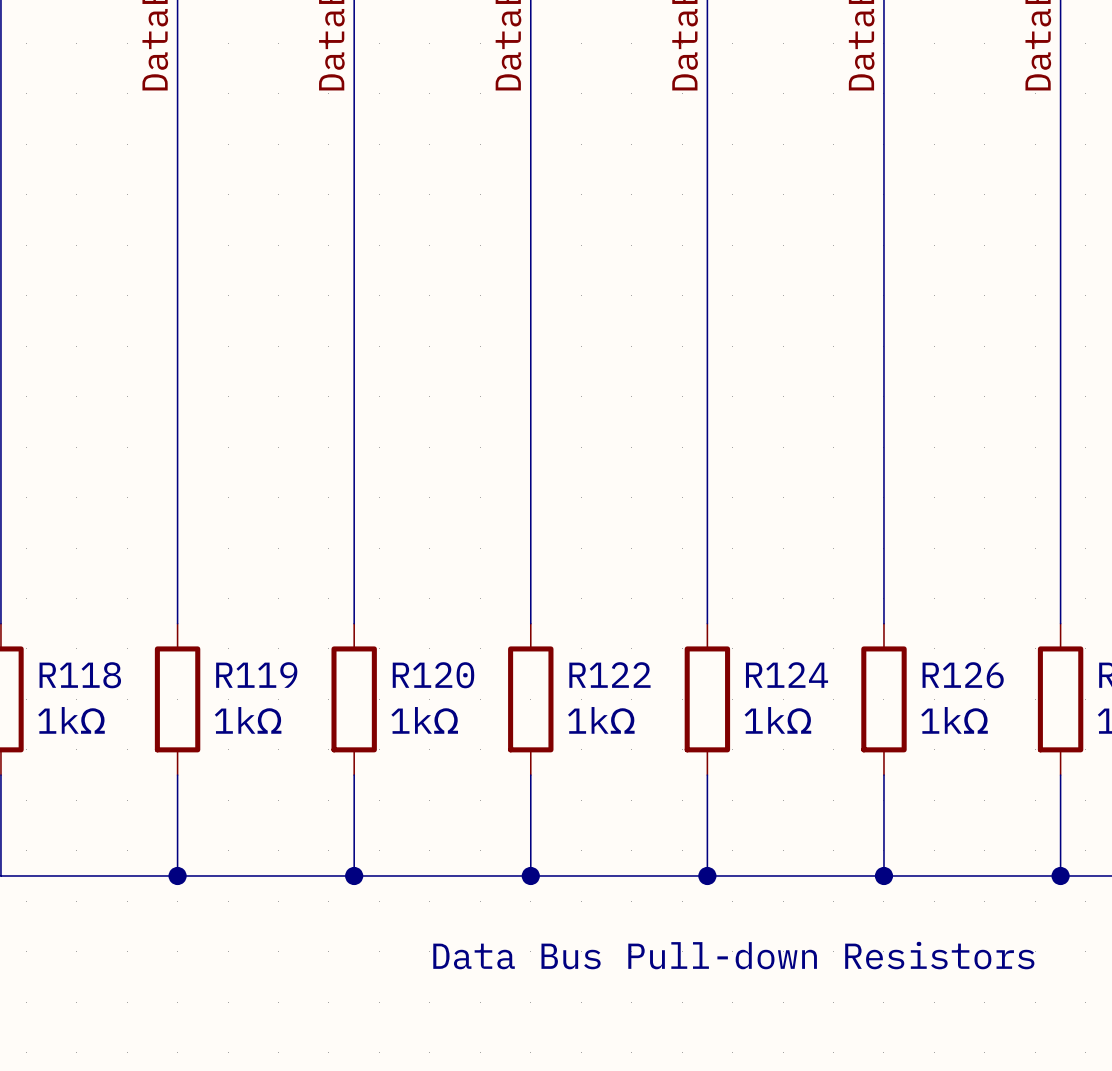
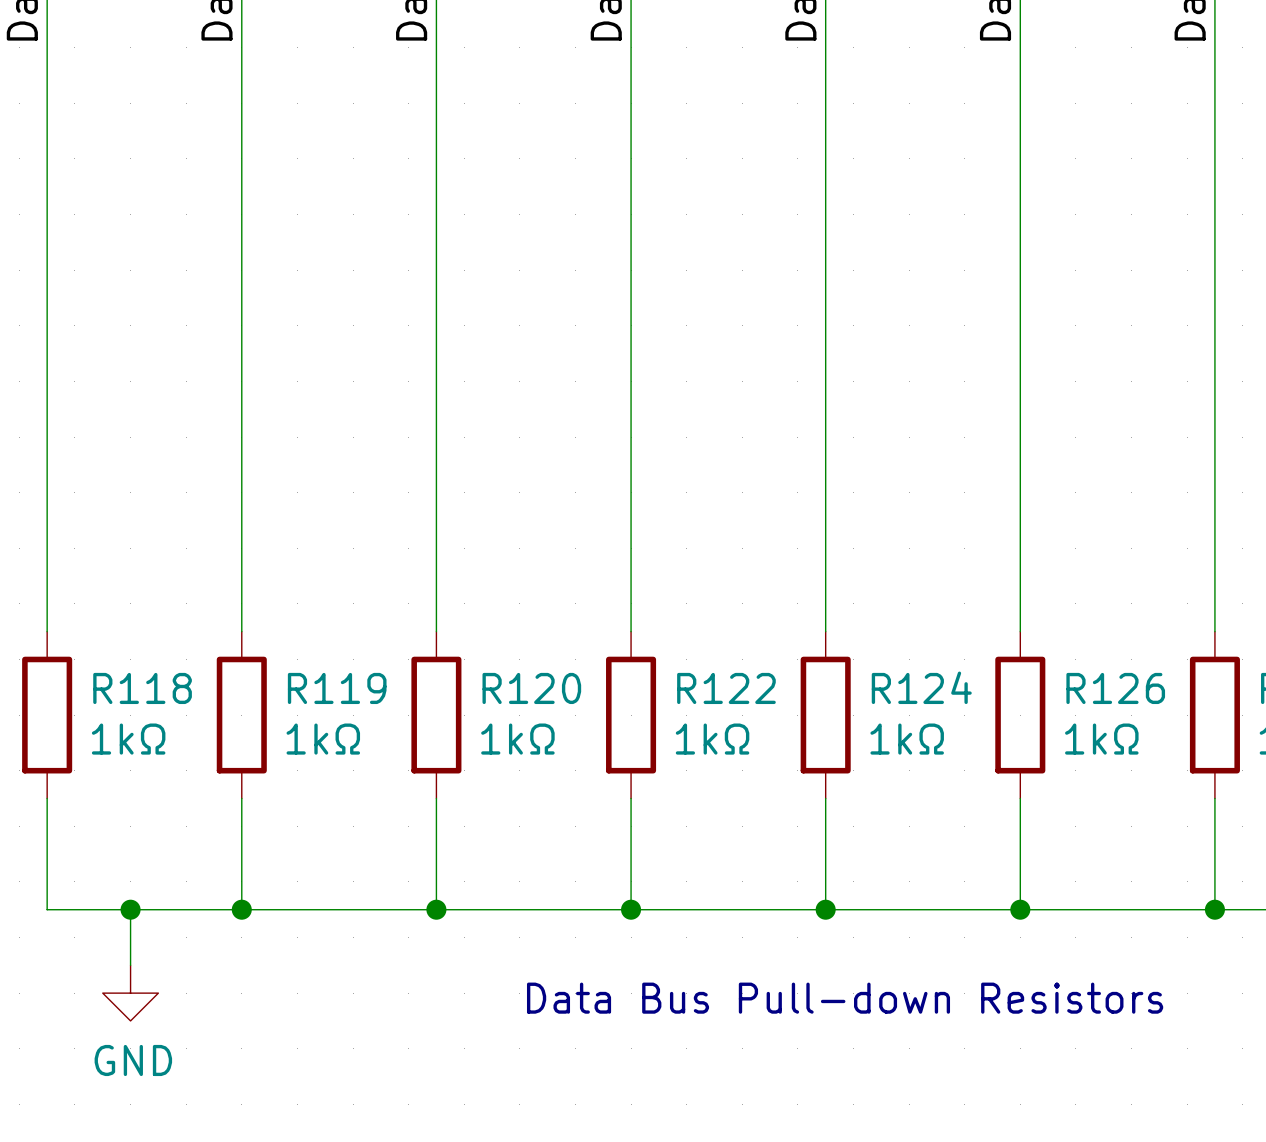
wire: none -> (130, 909) (130, 965)
junction: none -> (130, 909)
power symbol: none -> GND (130, 993)

